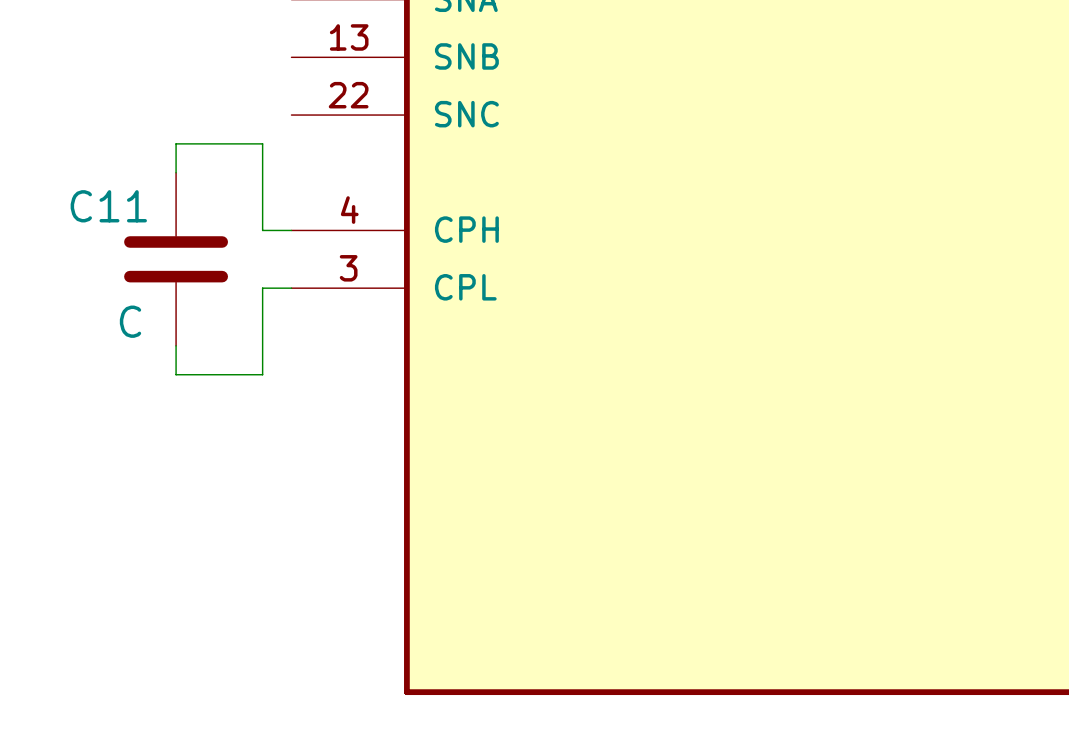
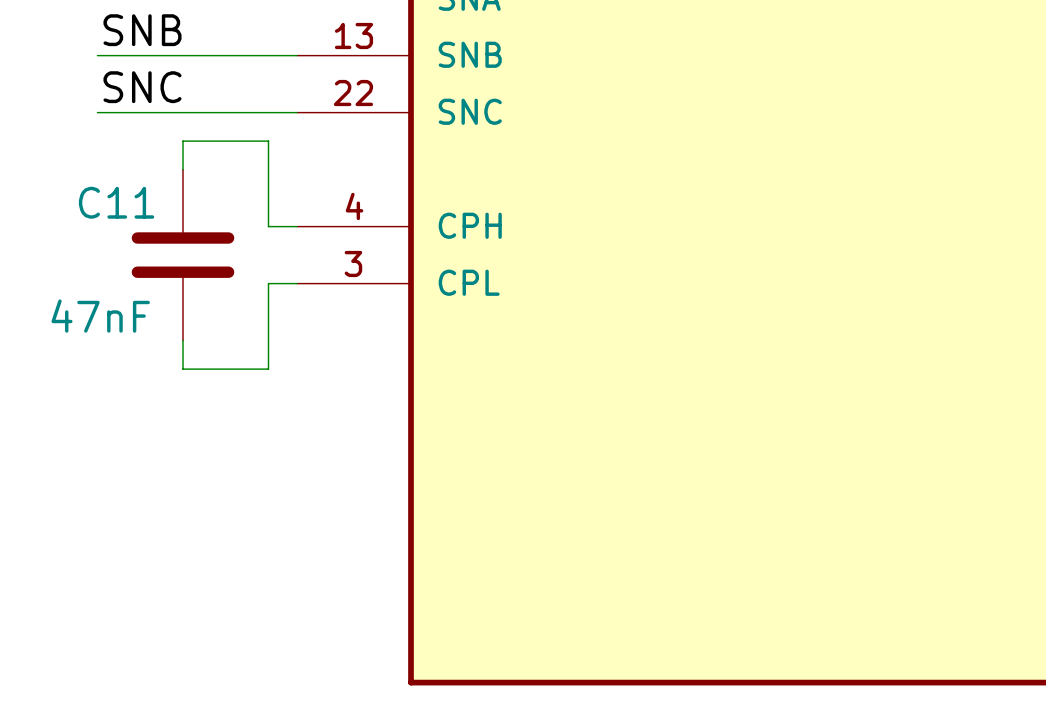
label: none -> SNB (142, 30)
wire: none -> (97, 55) (296, 55)
label: none -> SNC (142, 87)
wire: none -> (97, 112) (296, 112)
C11 value: C (130, 321) -> 47nF (100, 316)

